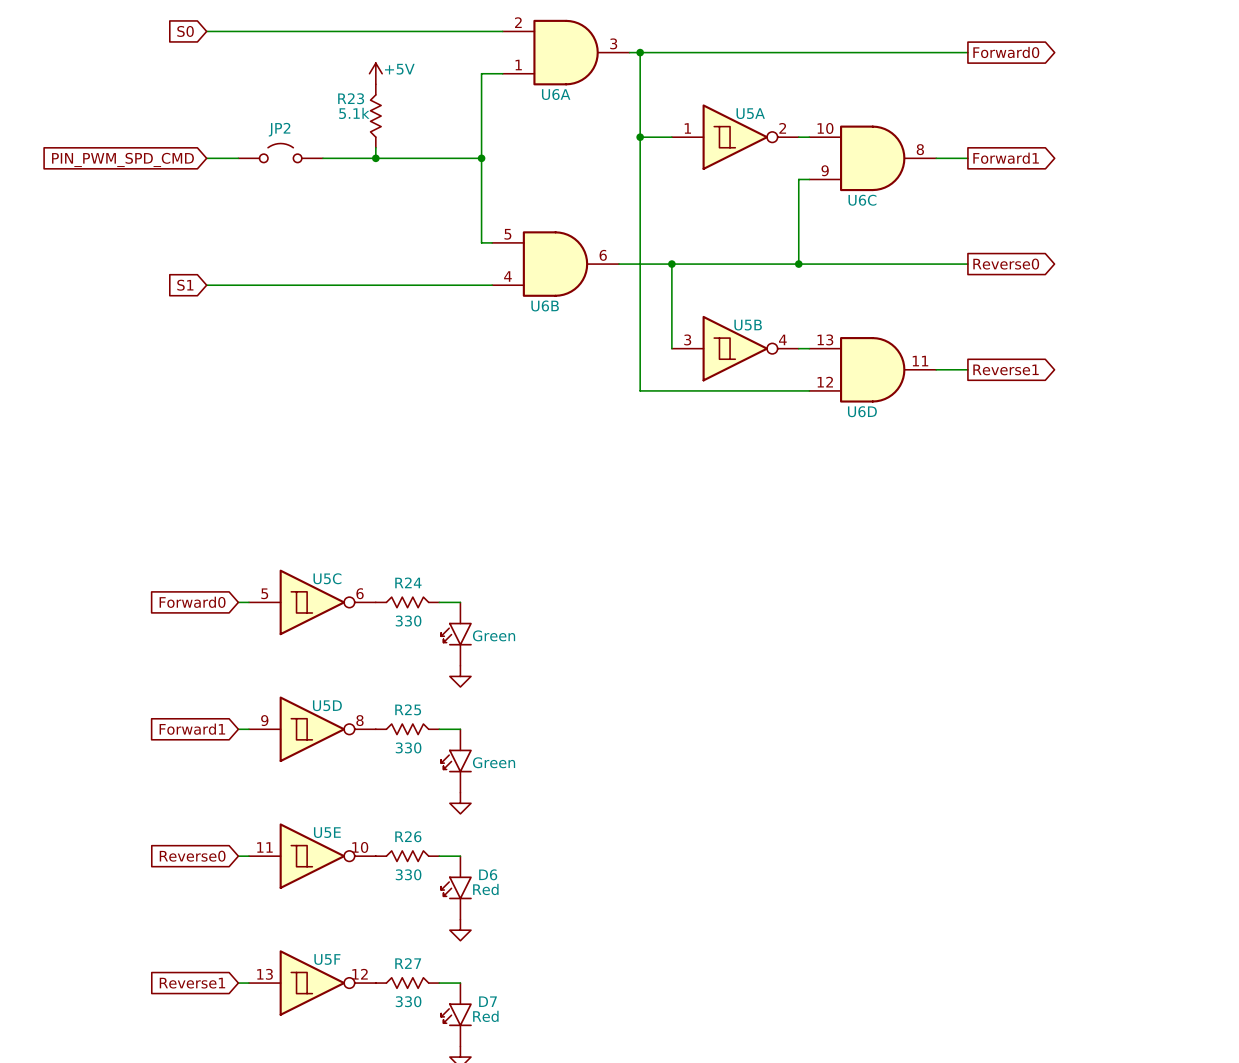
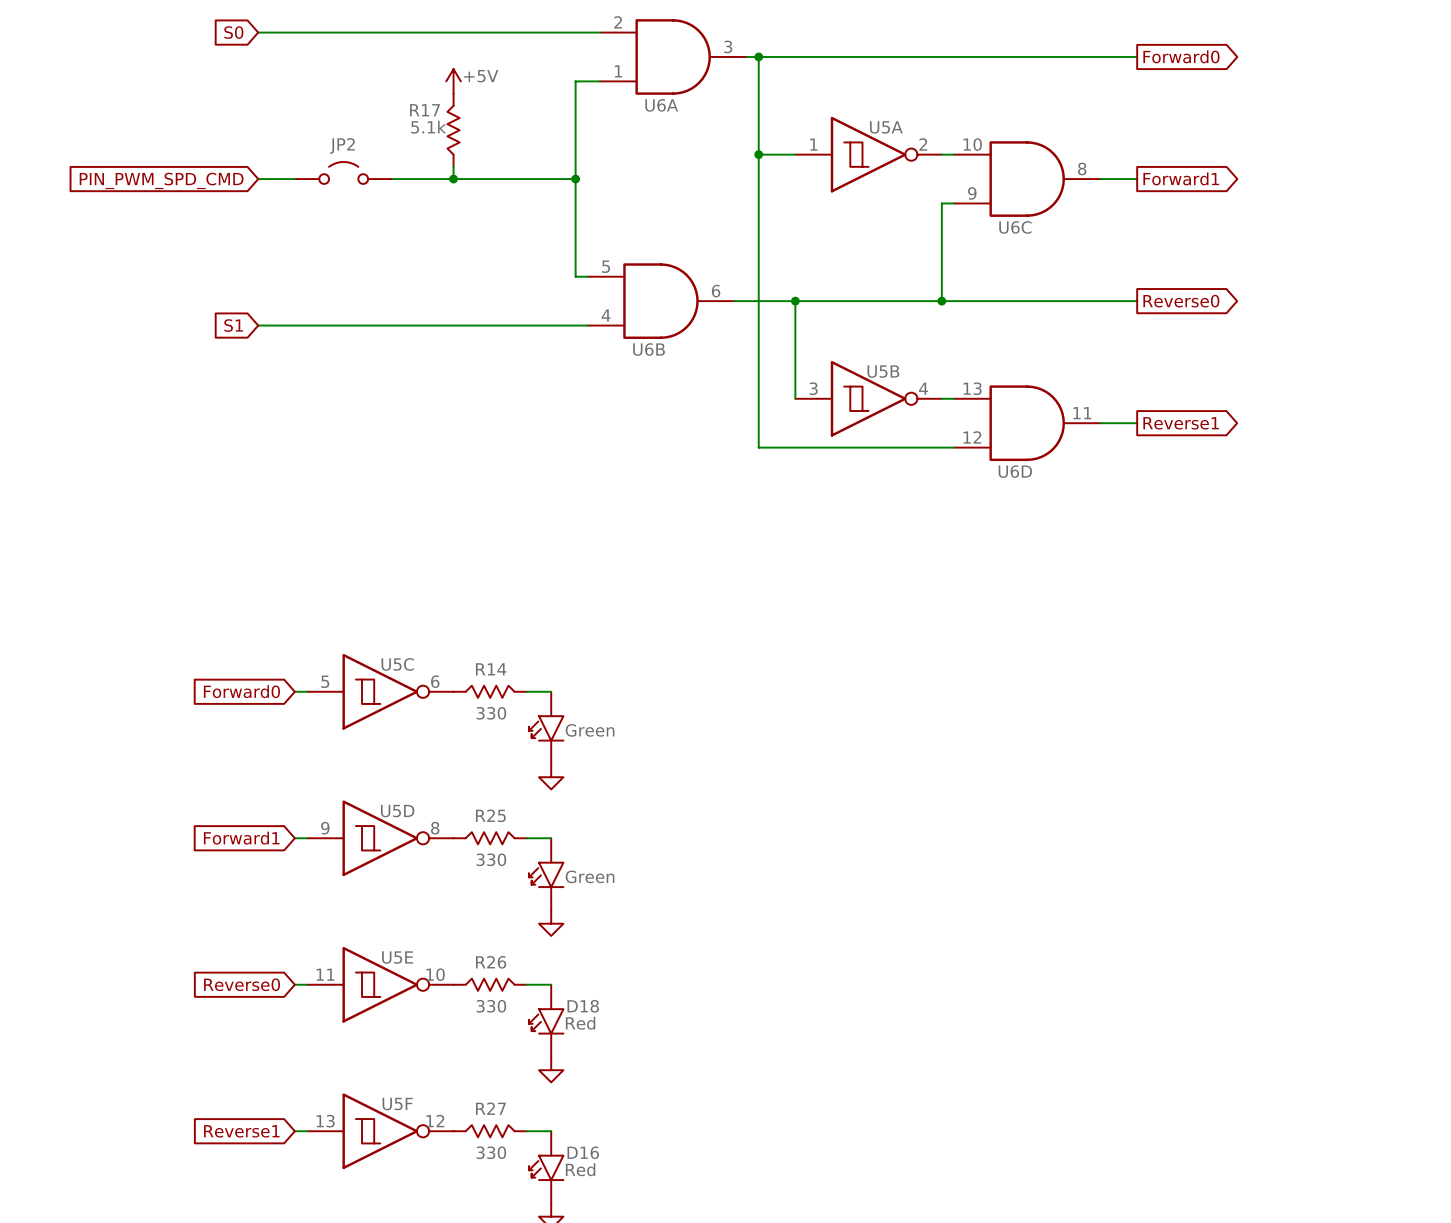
R23 name: R23 (351, 98) -> R17 (424, 110)
R24 name: R24 (408, 582) -> R14 (491, 669)
D6 name: D6 (488, 874) -> D18 (583, 1006)
D7 name: D7 (488, 1001) -> D16 (583, 1152)

